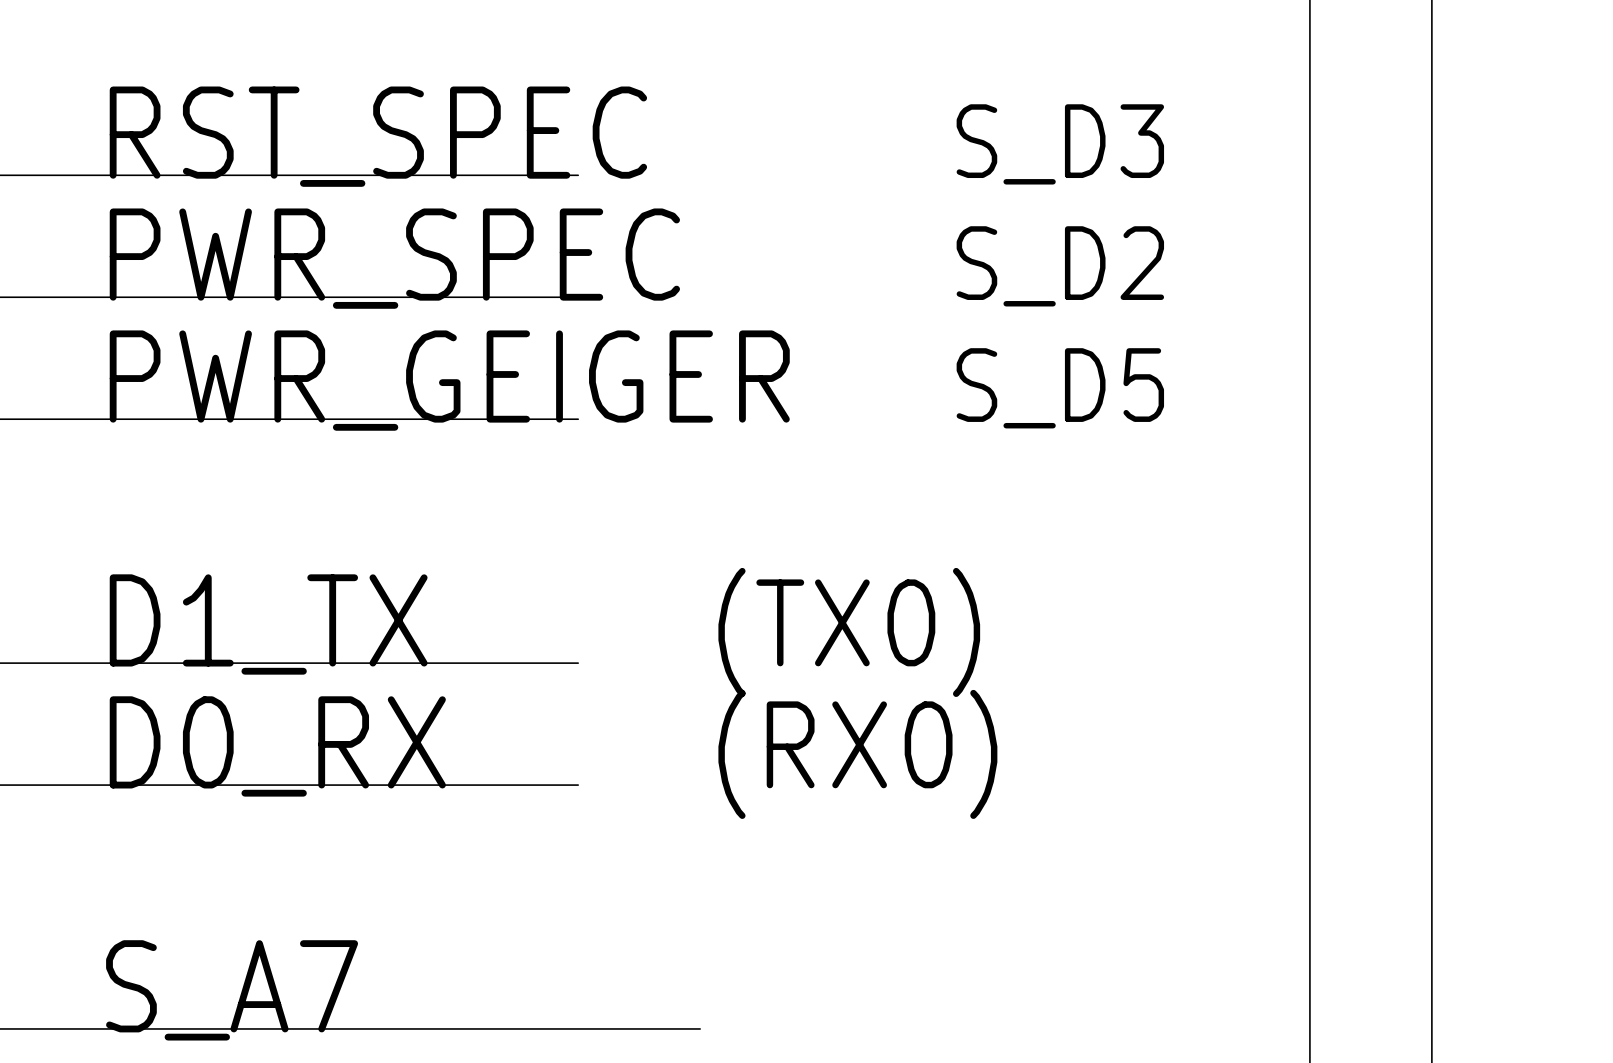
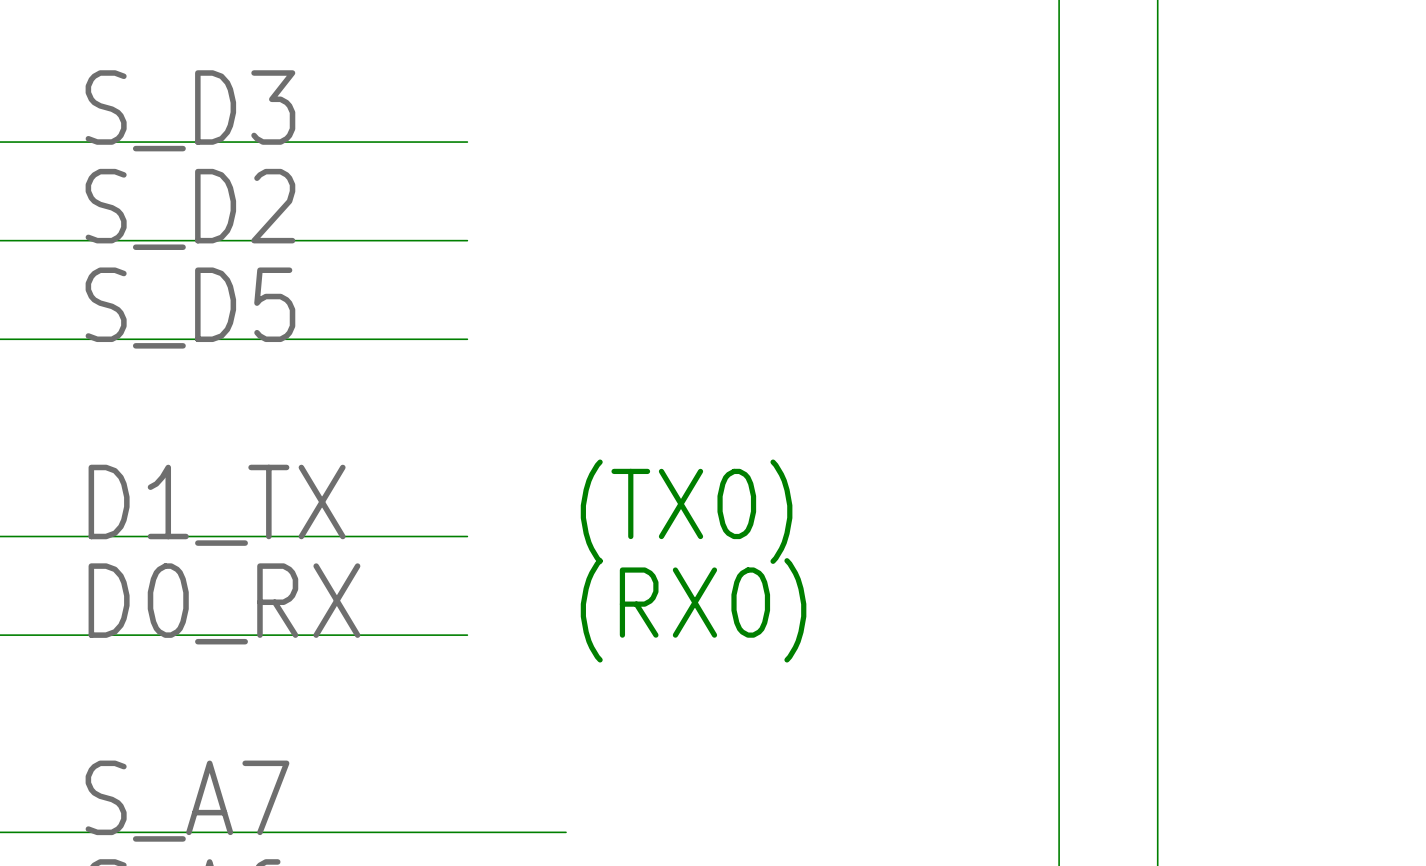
label: RST_SPEC (378, 136) -> S_D3 (190, 110)
text: S_D3 (1060, 144) -> none
label: PWR_SPEC (394, 258) -> S_D2 (190, 209)
text: S_D2 (1060, 266) -> none
label: PWR_GEIGER (449, 380) -> S_D5 (190, 308)
text: S_D5 (1060, 388) -> none

